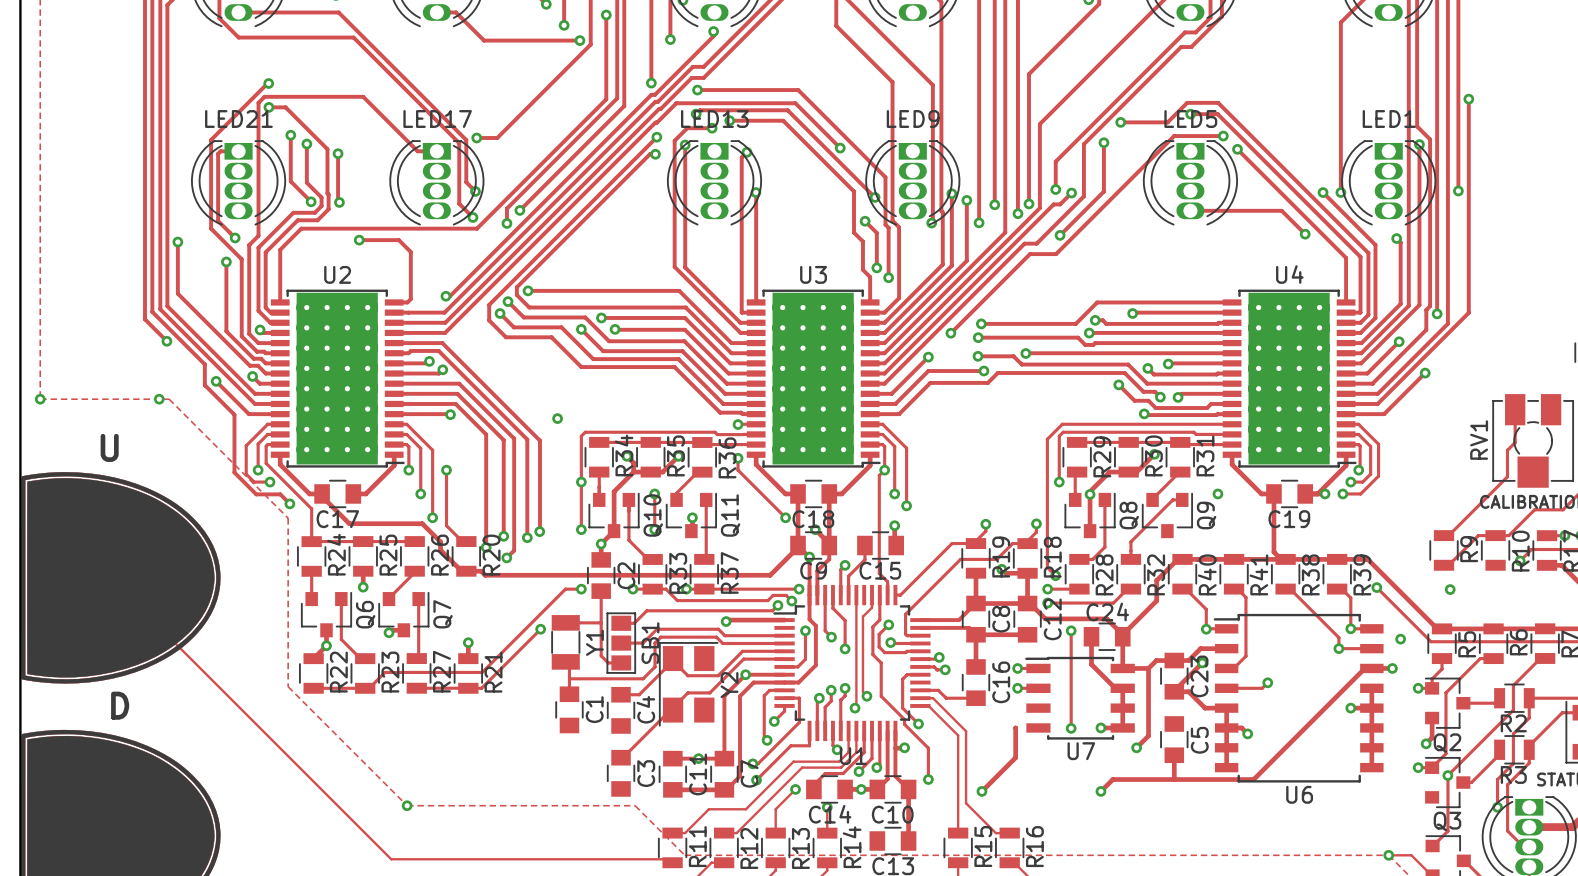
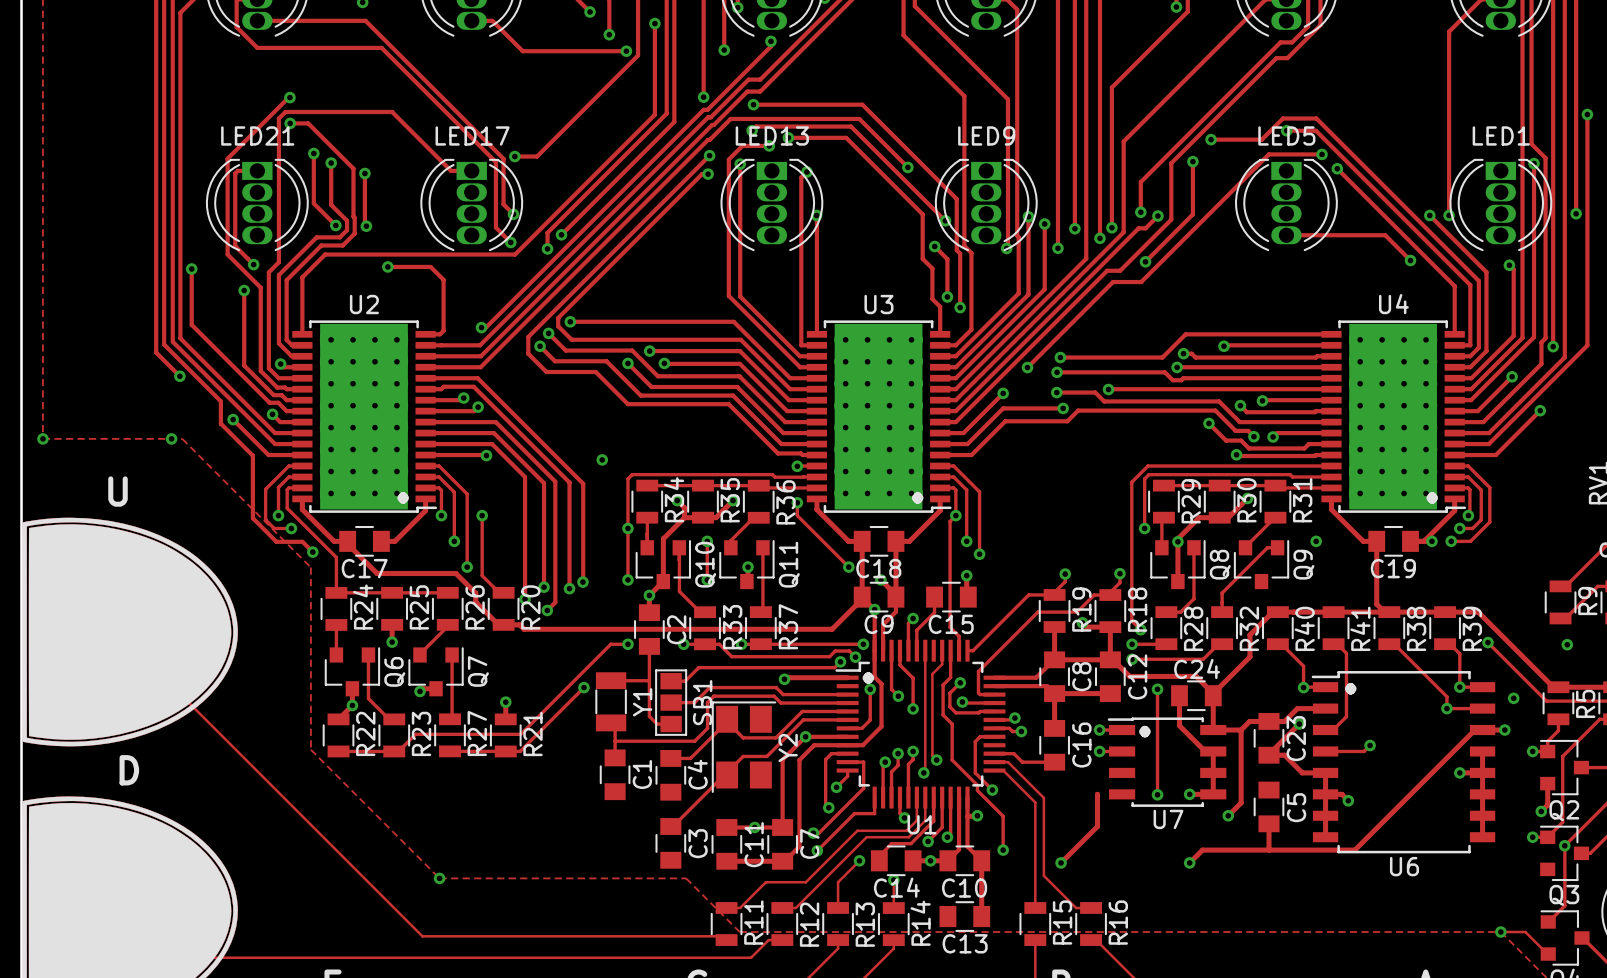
text: none -> . (403, 497)
text: none -> . (917, 497)
text: none -> . (1432, 497)
text: none -> . (868, 678)
text: none -> . (1350, 688)
text: none -> . (1144, 731)

